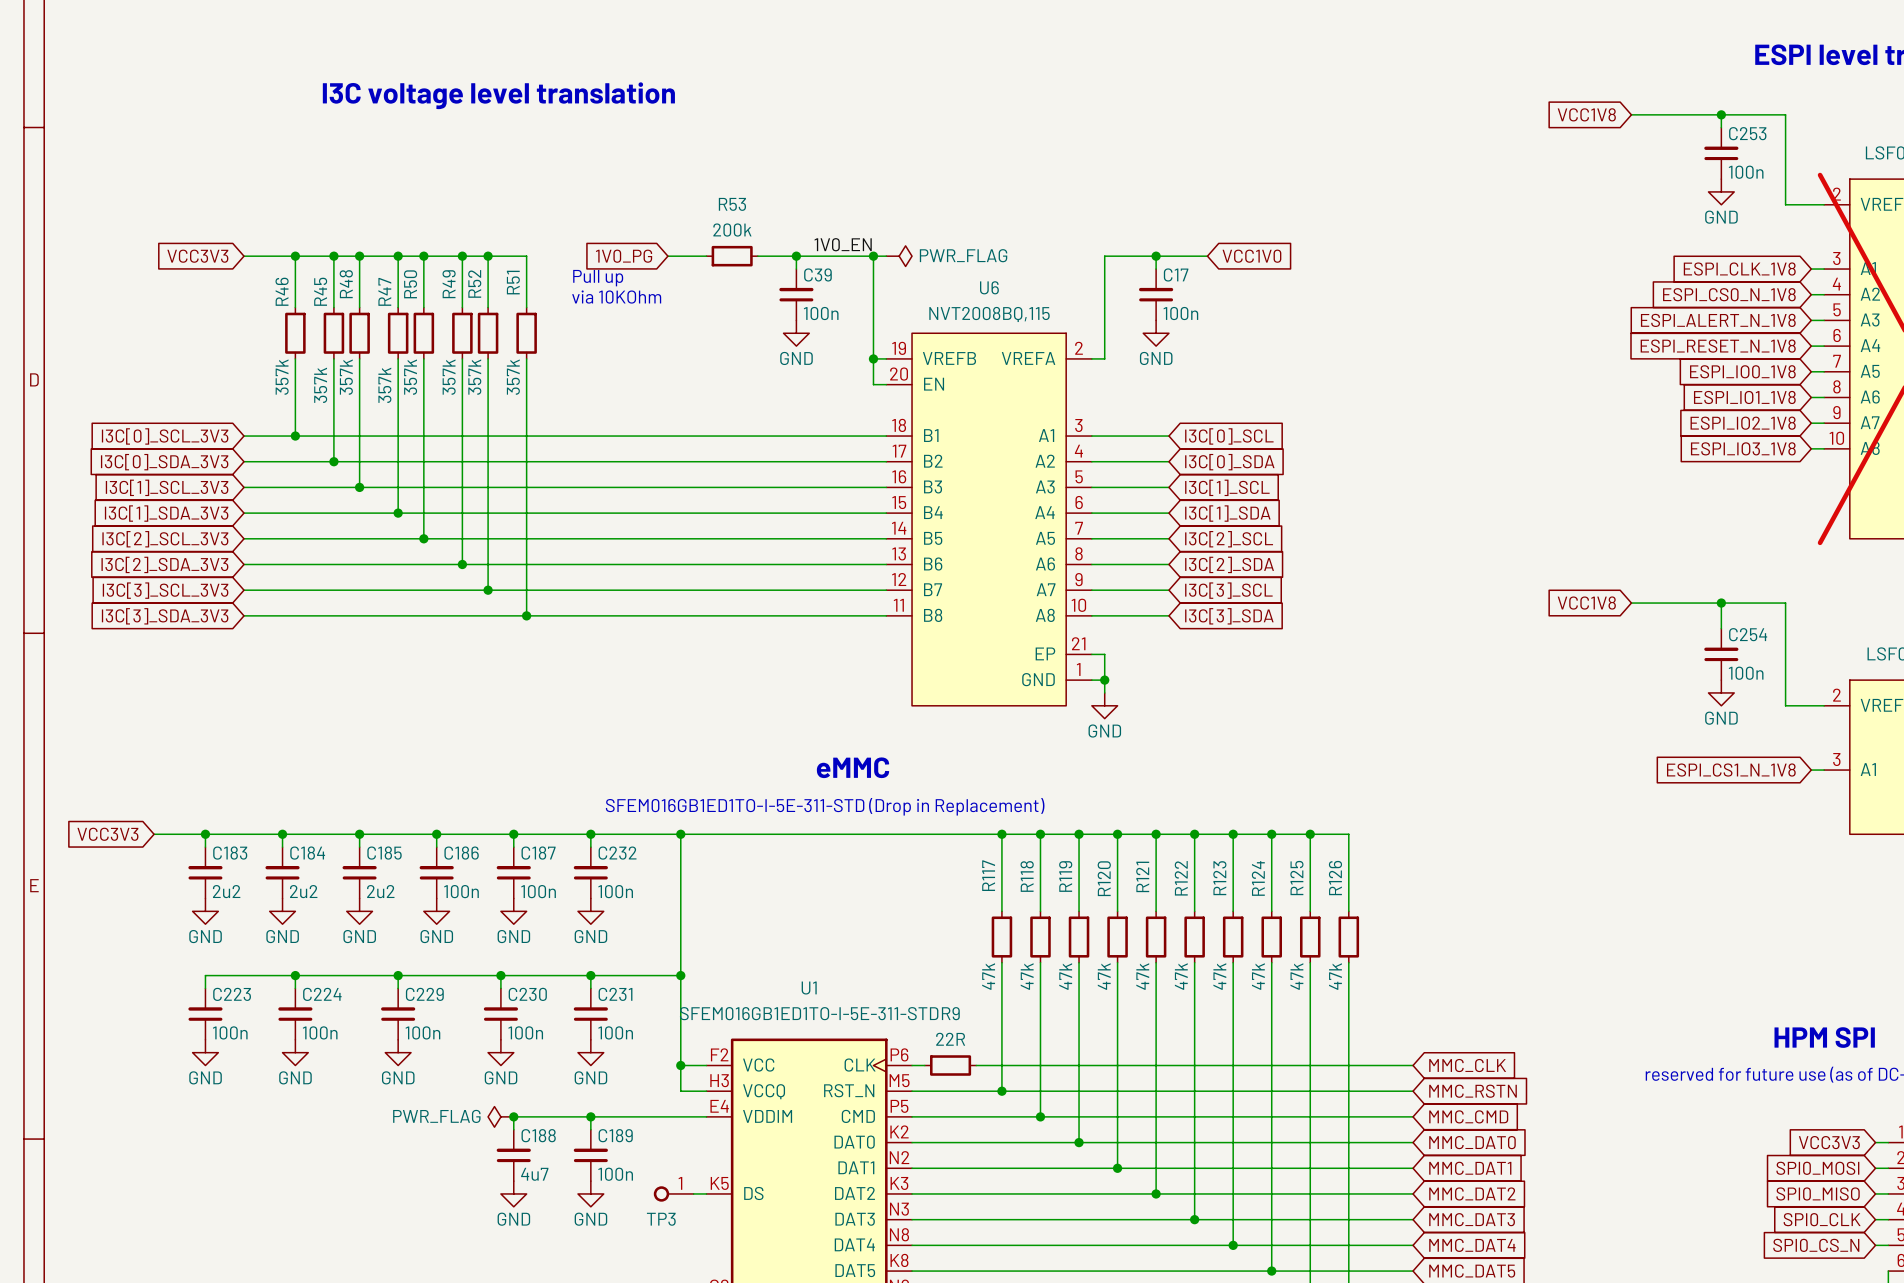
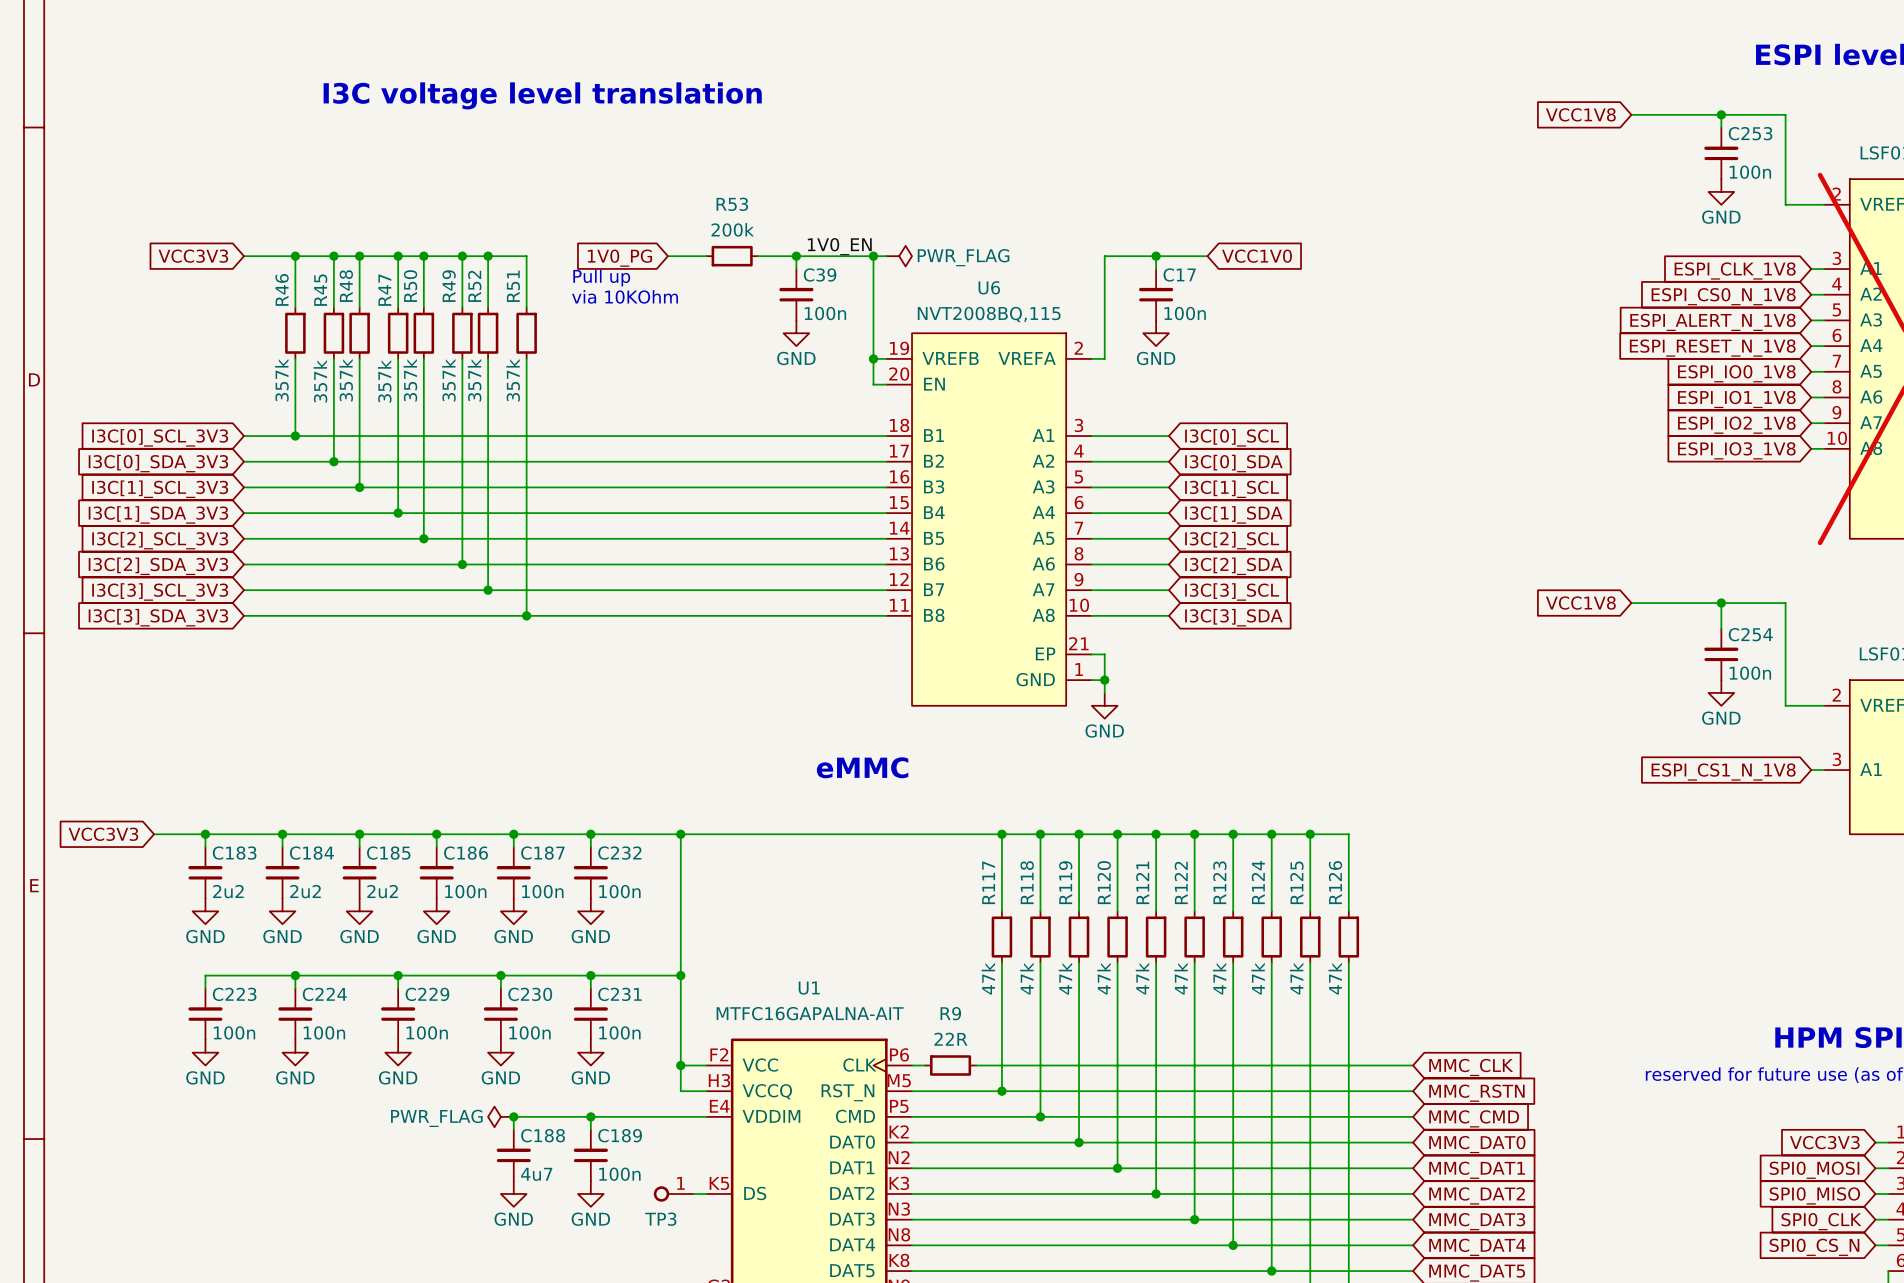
text: SFEM016GB1ED1TO-I-5E-311-STD (Drop in Replacement) (825, 806) -> none
U1 value: SFEM016GB1ED1TO-I-5E-311-STD (809, 1013) -> MTFC16GAPALNA-AIT (810, 1013)

